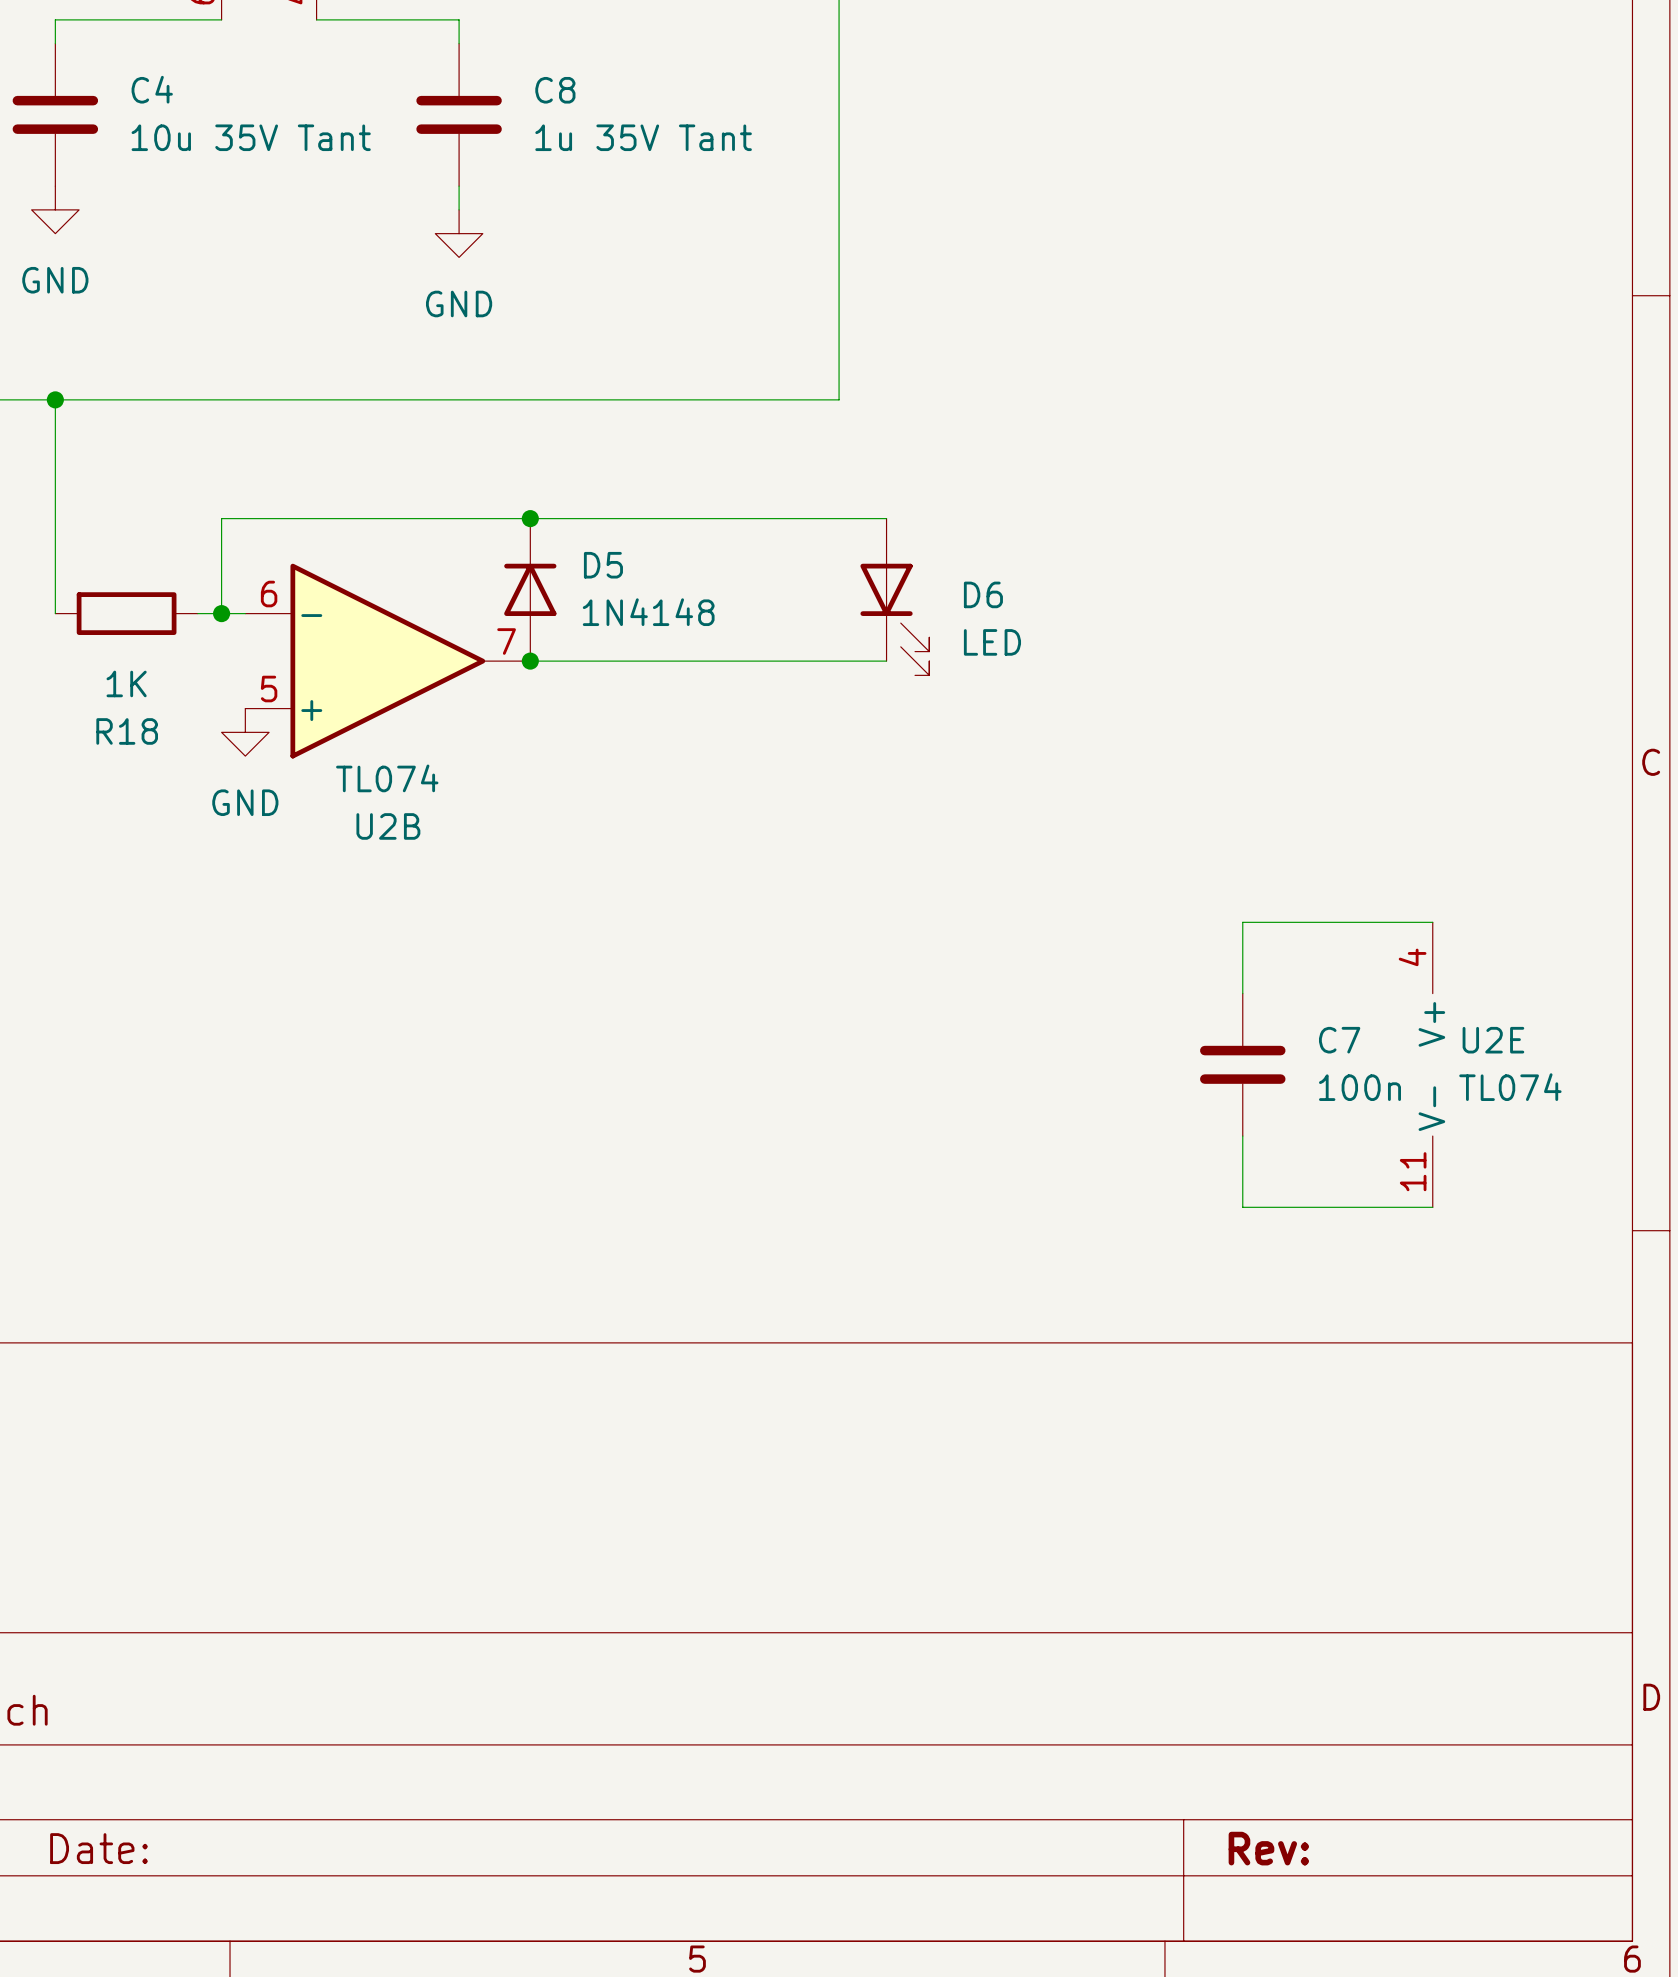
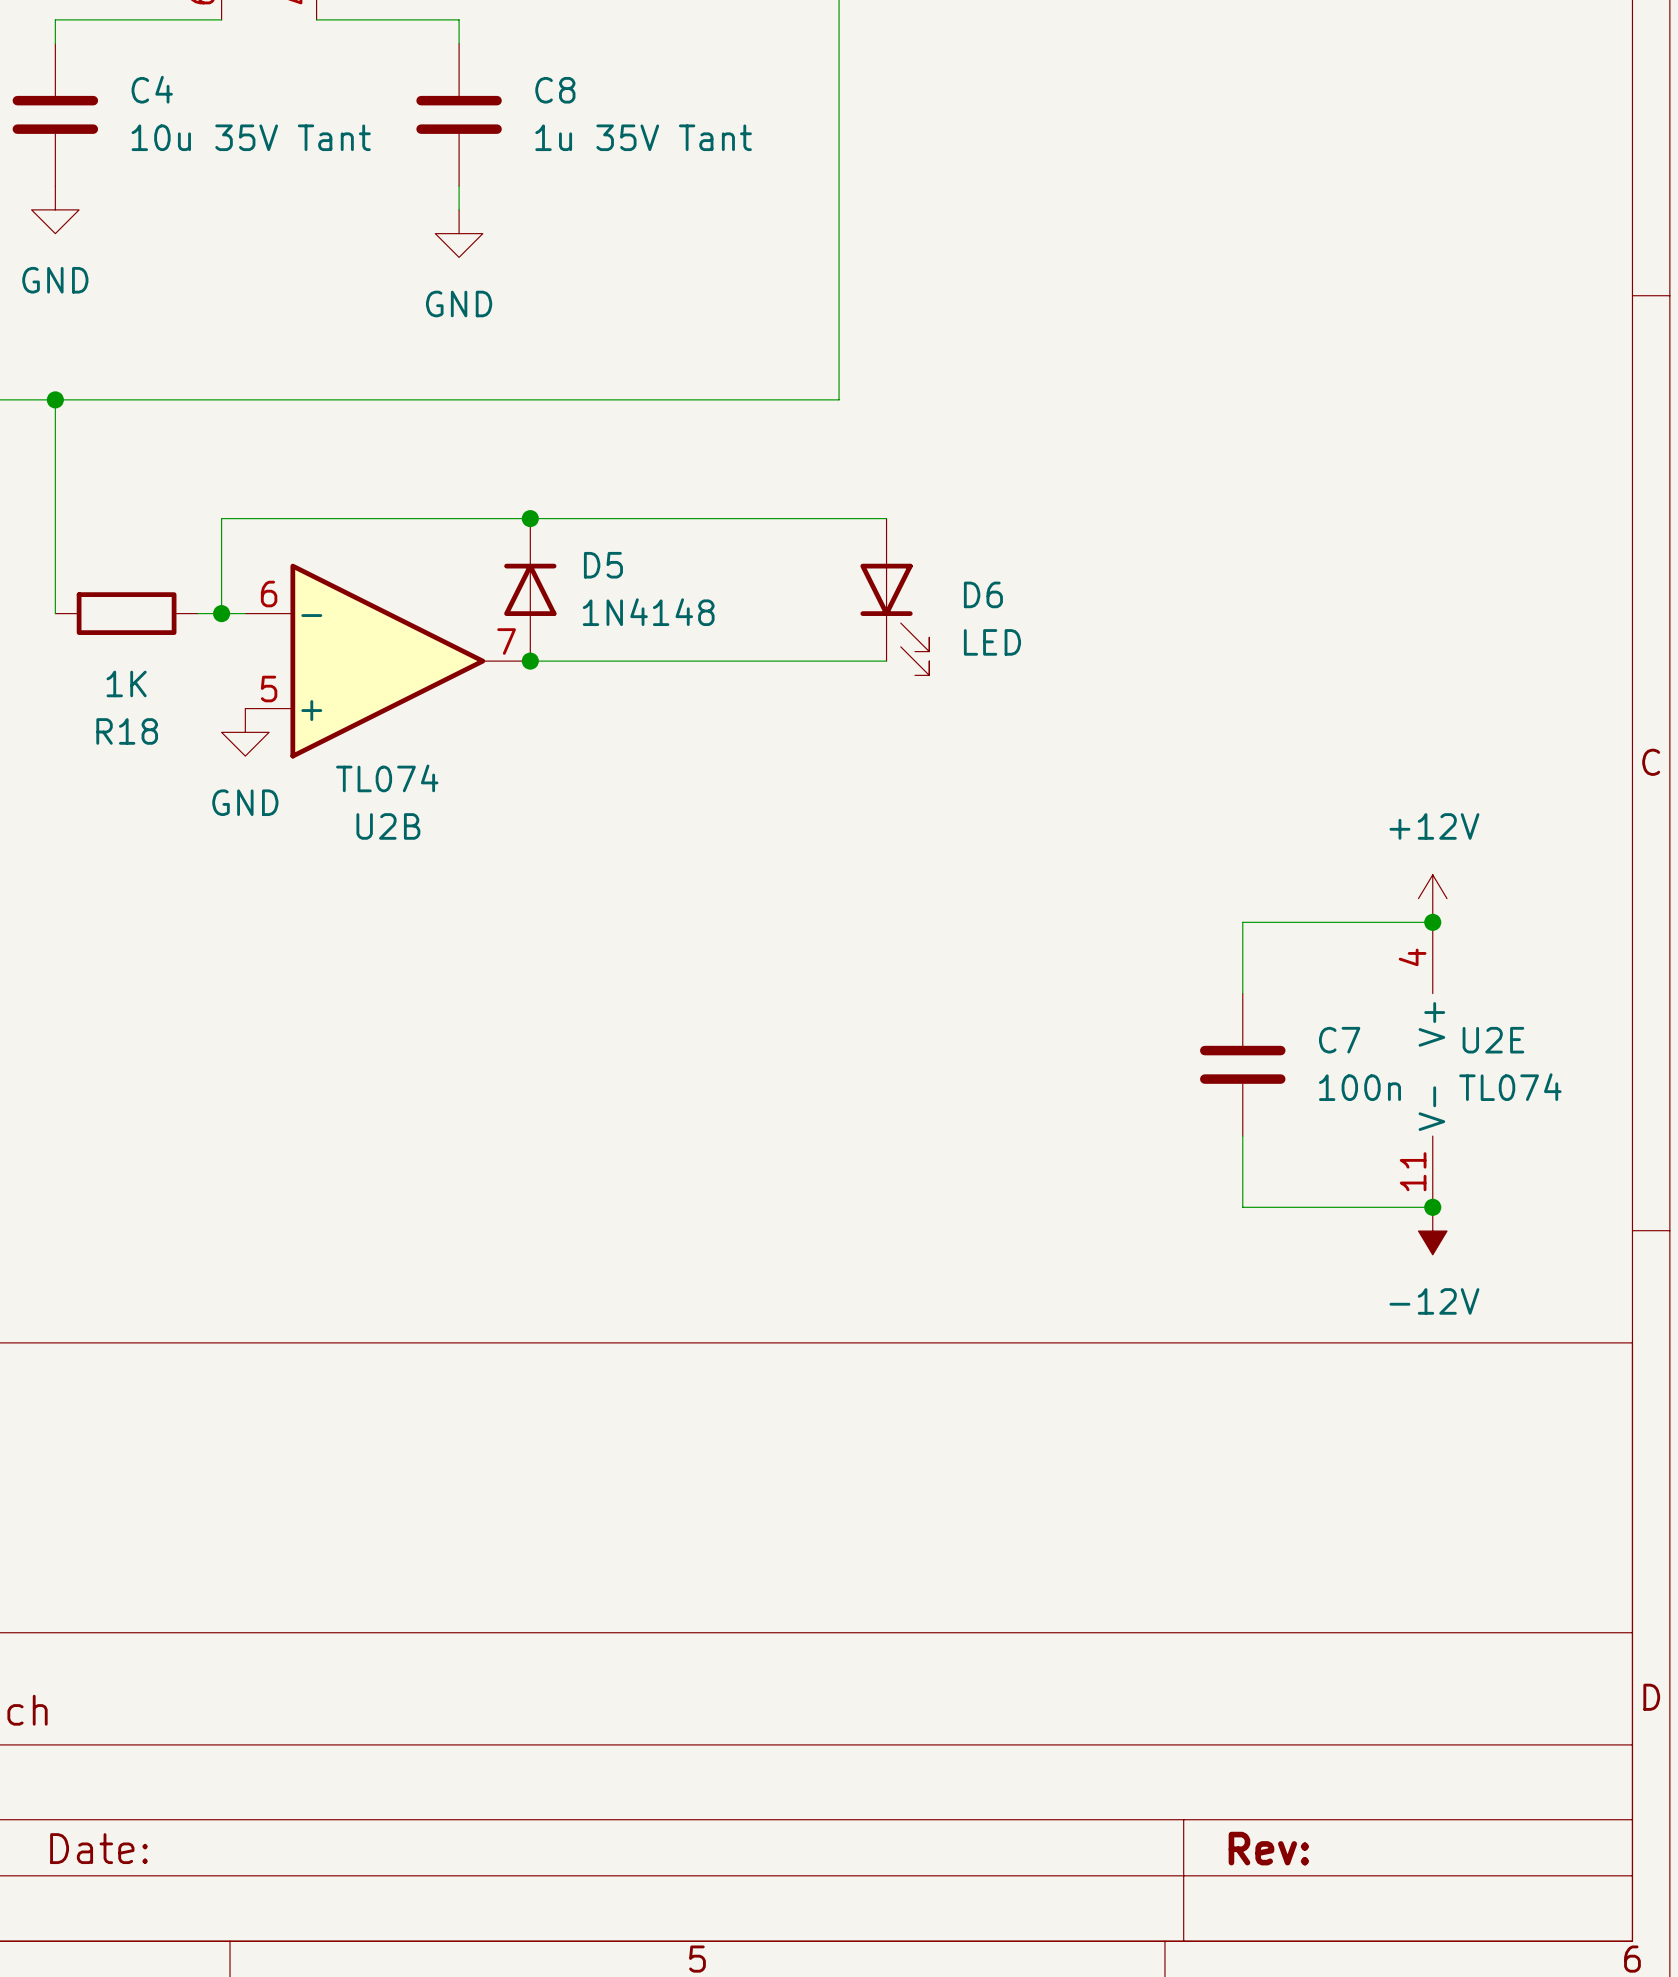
power symbol: none -> +12V (1432, 898)
junction: none -> (1432, 922)
junction: none -> (1432, 1207)
power symbol: none -> -12V (1432, 1231)

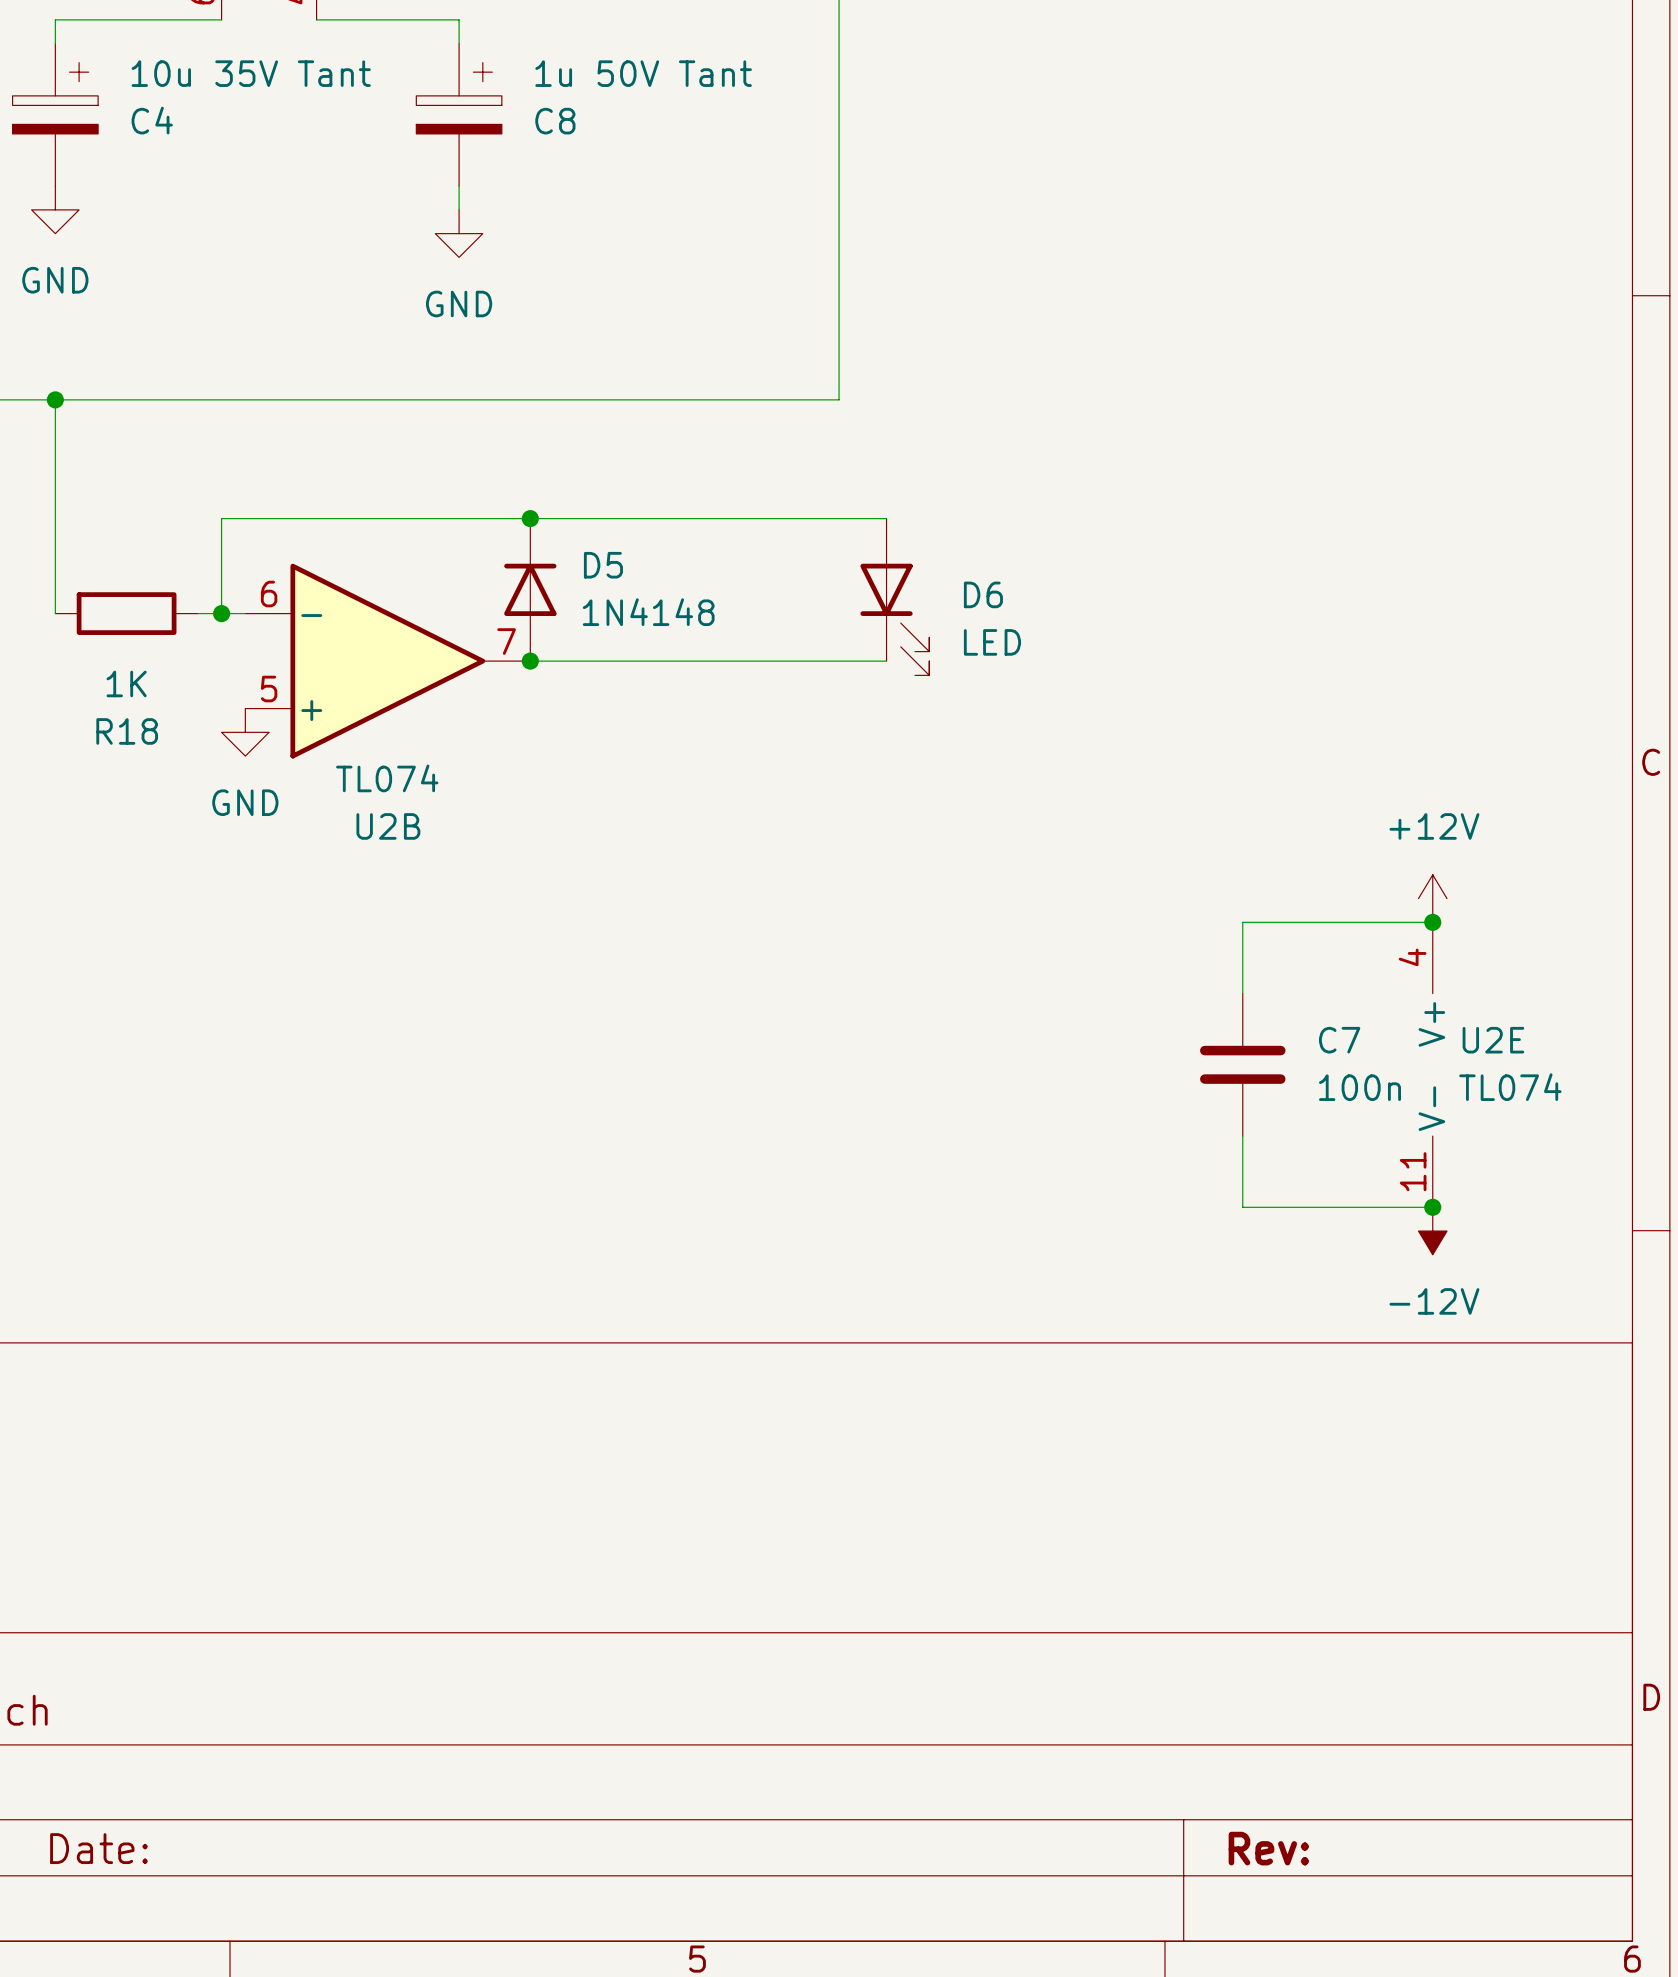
C4 symbol: [12, 43, 99, 187] -> [12, 43, 99, 187]
C8 symbol: [416, 43, 502, 187] -> [416, 43, 502, 187]
C4 value position: 10u 35V Tant (251, 137) -> 10u 35V Tant (251, 73)
C8 value: 1u 35V Tant (643, 137) -> 1u 50V Tant (643, 73)

